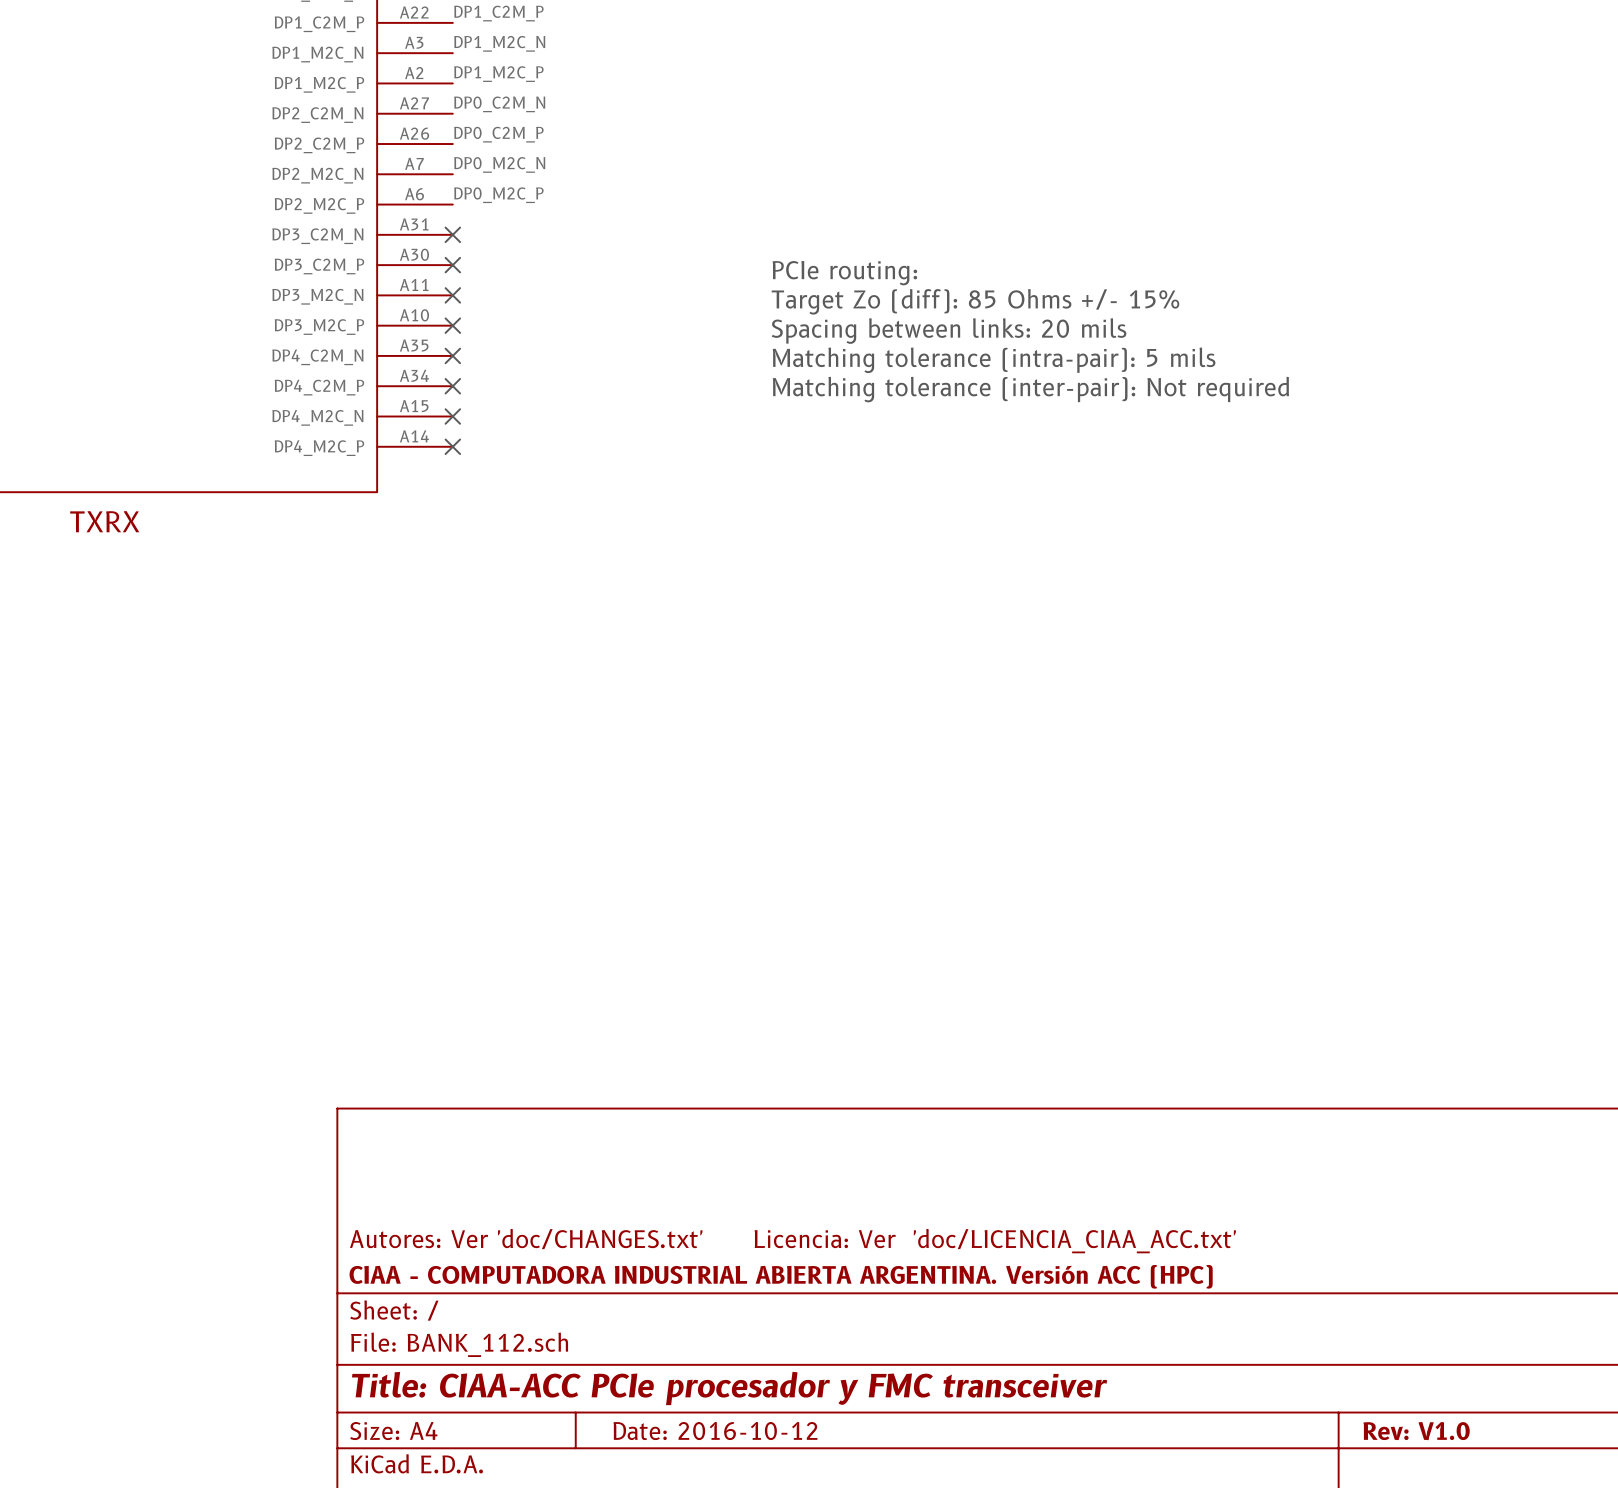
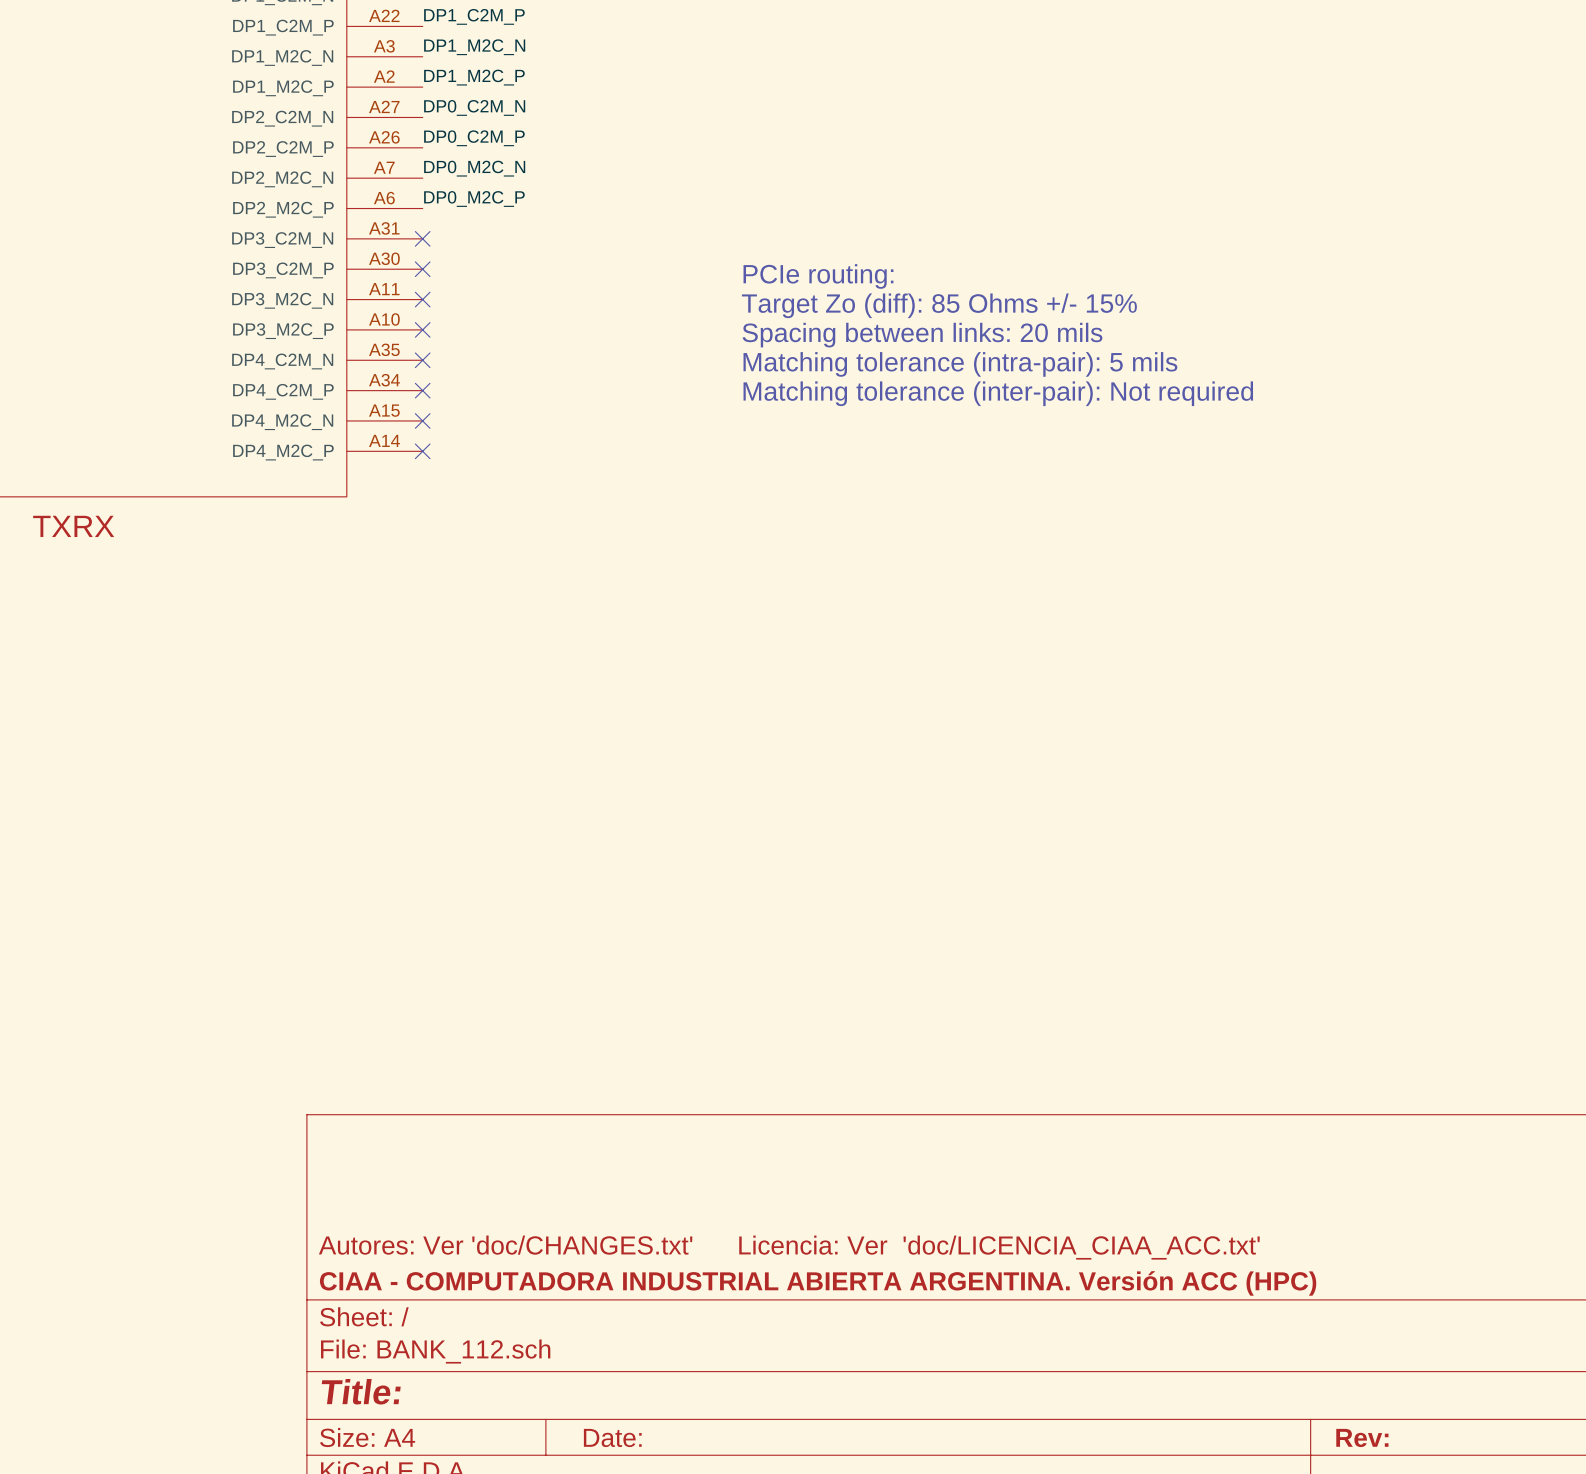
title block: Title: CIAA-ACC PCIe procesador y FMC transceiver (729, 1388) -> Title: (361, 1391)
title block: Date: 2016-10-12 (715, 1431) -> Date: (612, 1437)
title block: Rev: V1.0 (1416, 1431) -> Rev: (1362, 1437)

